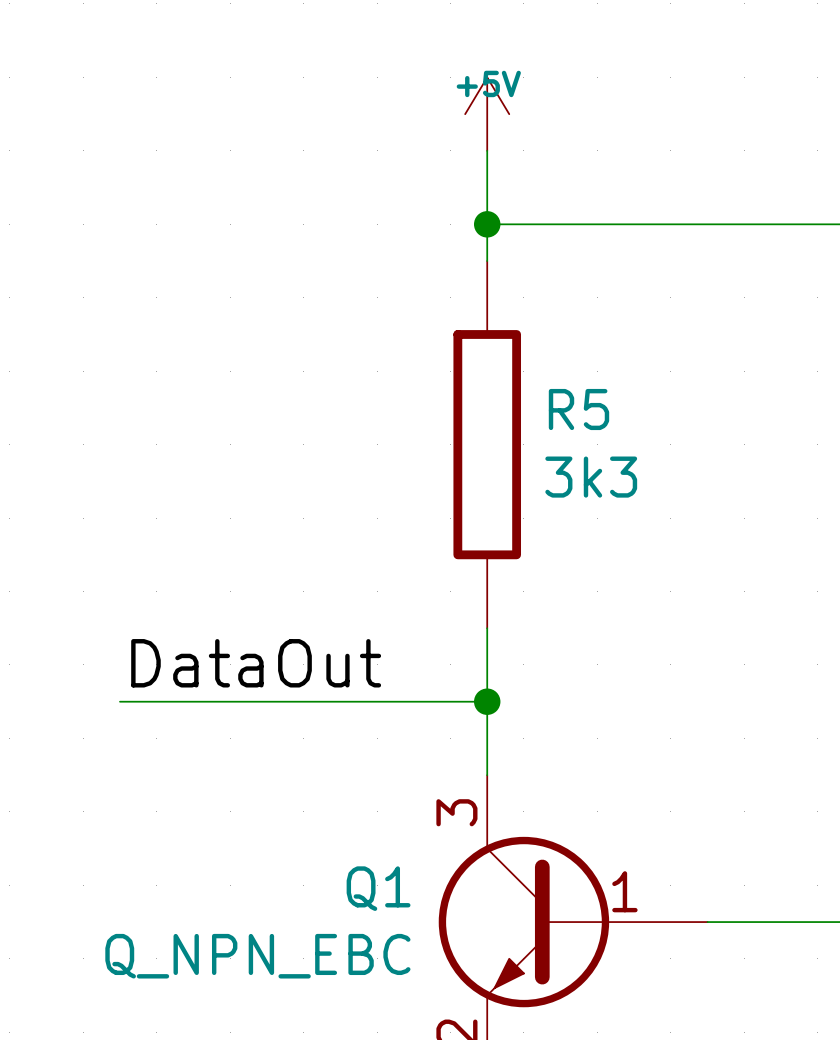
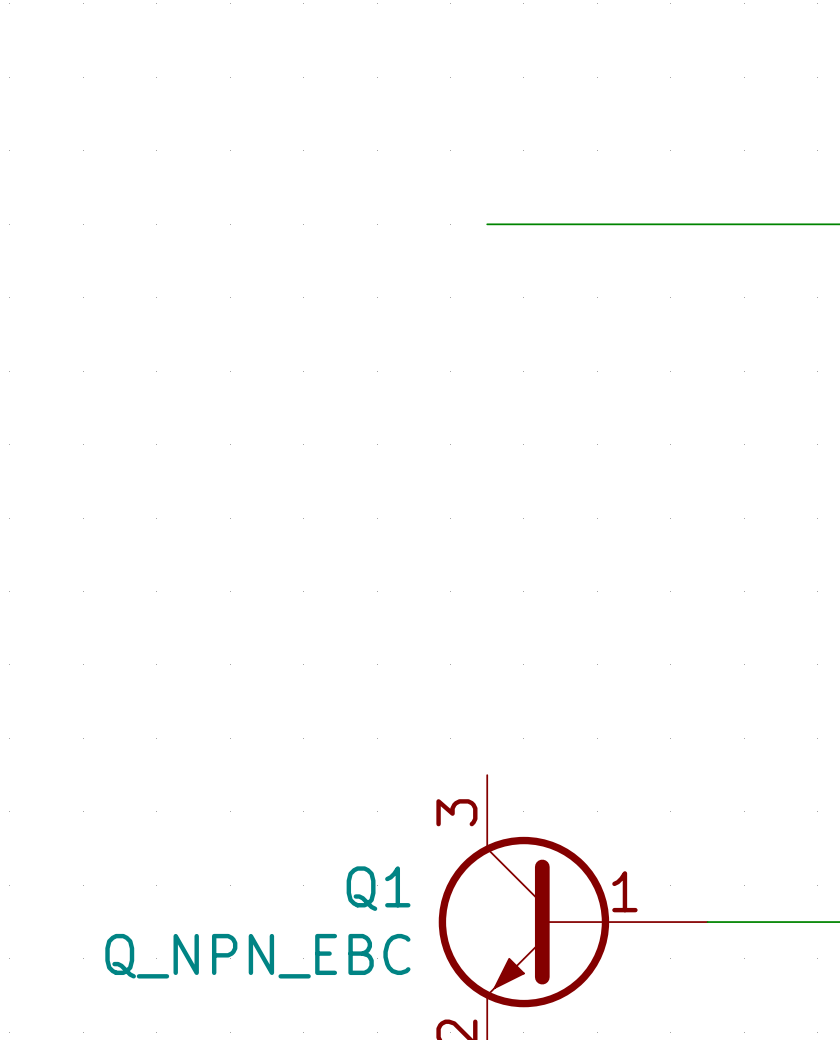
power symbol: +5V (487, 114) -> none
wire: (487, 150) (487, 261) -> none
junction: (487, 224) -> none
R5: 3k3 (487, 444) -> none
wire: (487, 628) (487, 775) -> none
label: DataOut (256, 663) -> none
wire: (119, 701) (487, 701) -> none
junction: (487, 701) -> none

